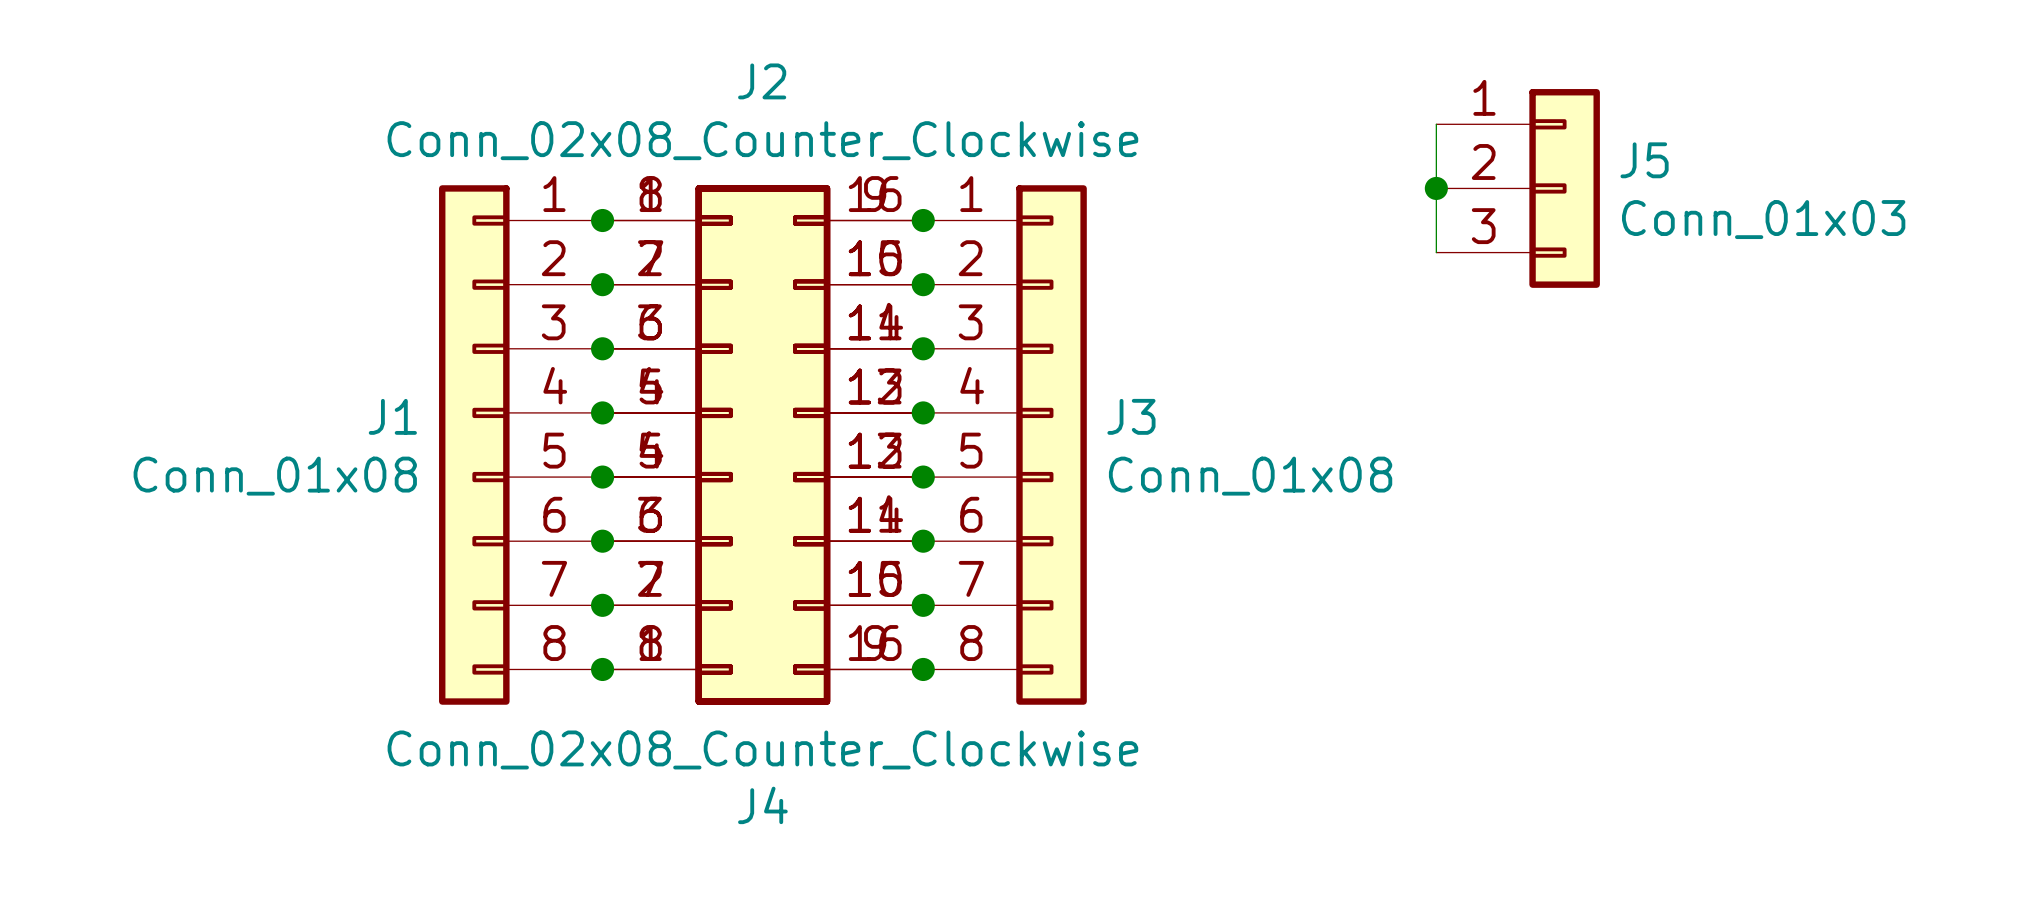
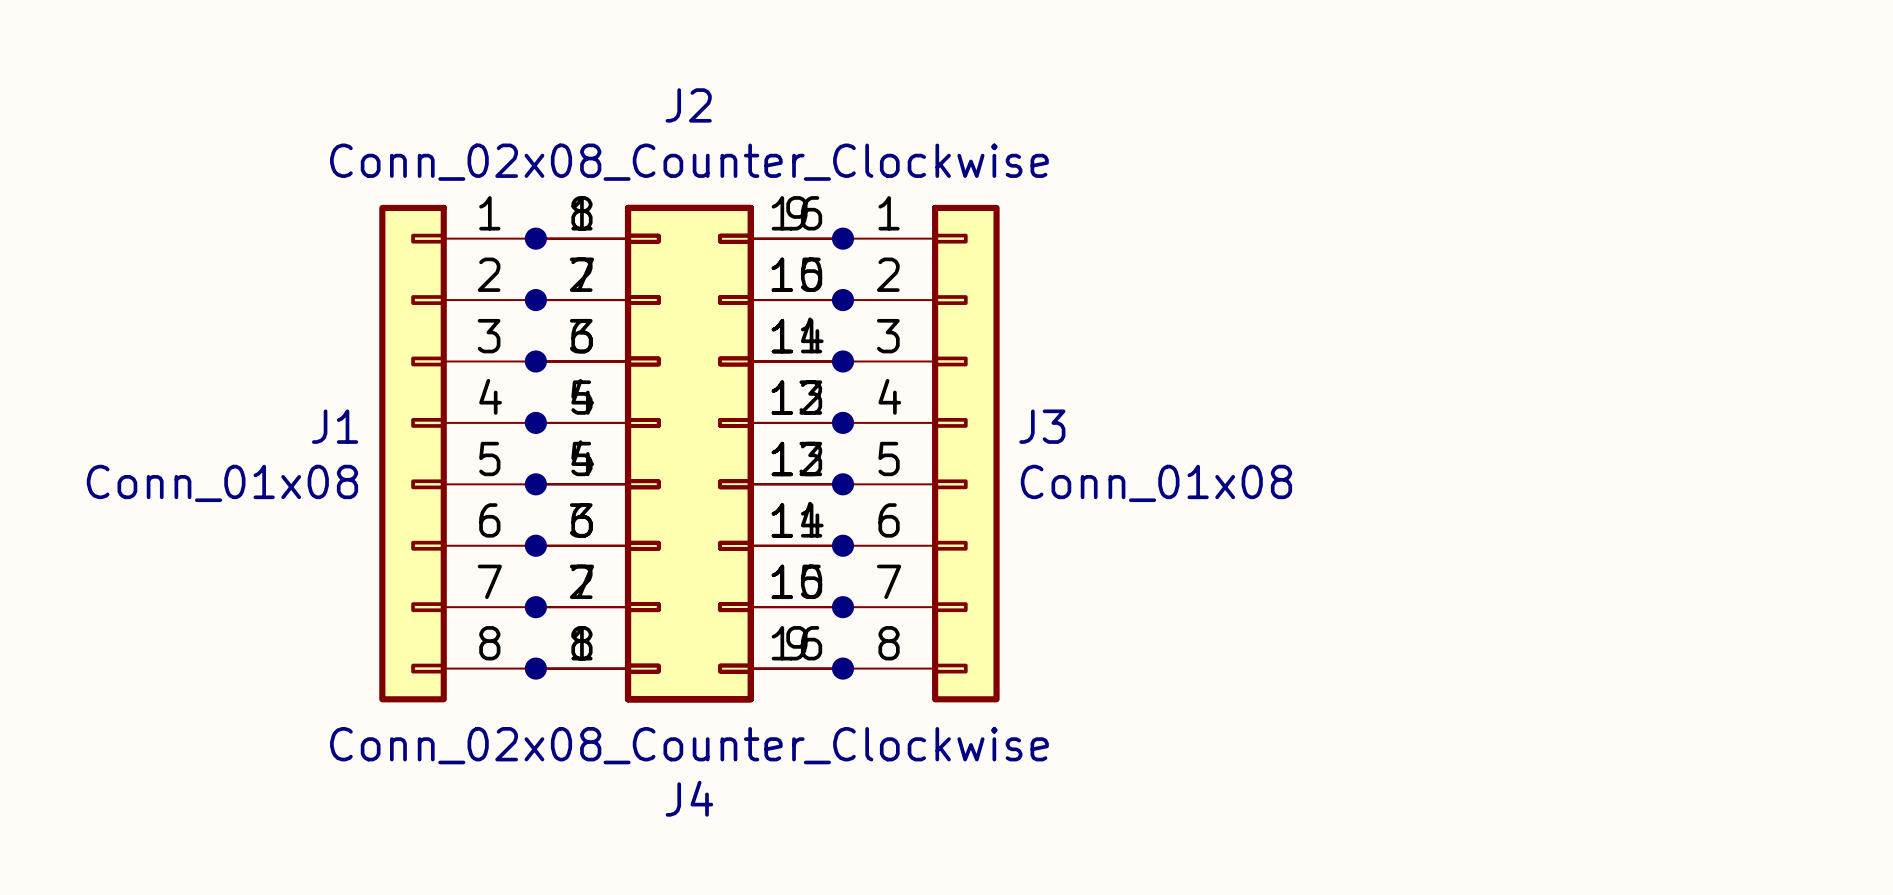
wire: (1436, 124) (1436, 252) -> none
junction: (1436, 188) -> none
J5: Conn_01x03 (1518, 188) -> none

